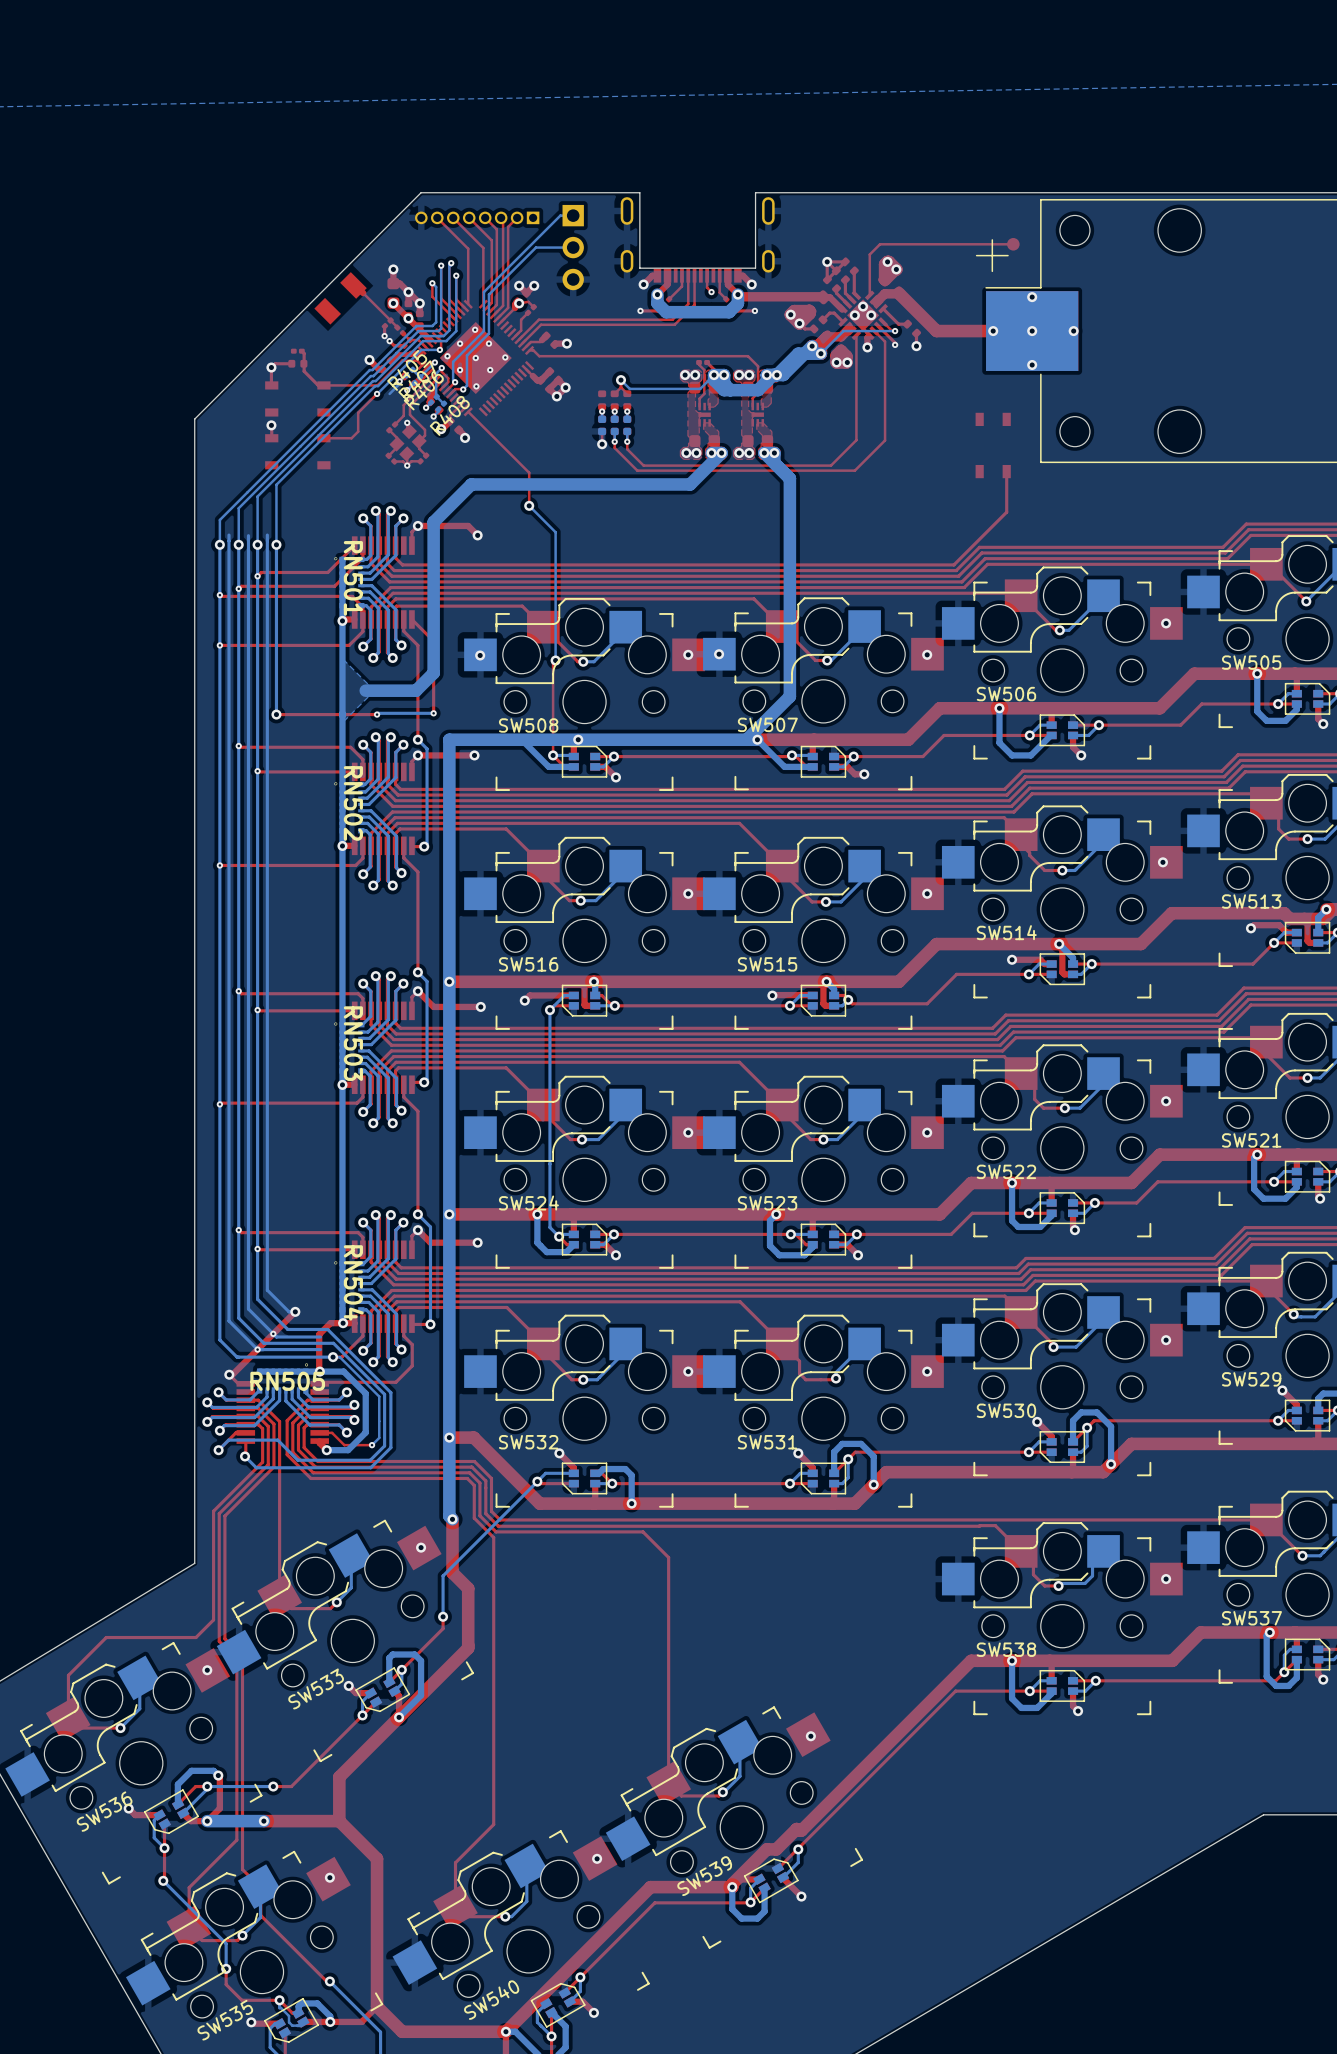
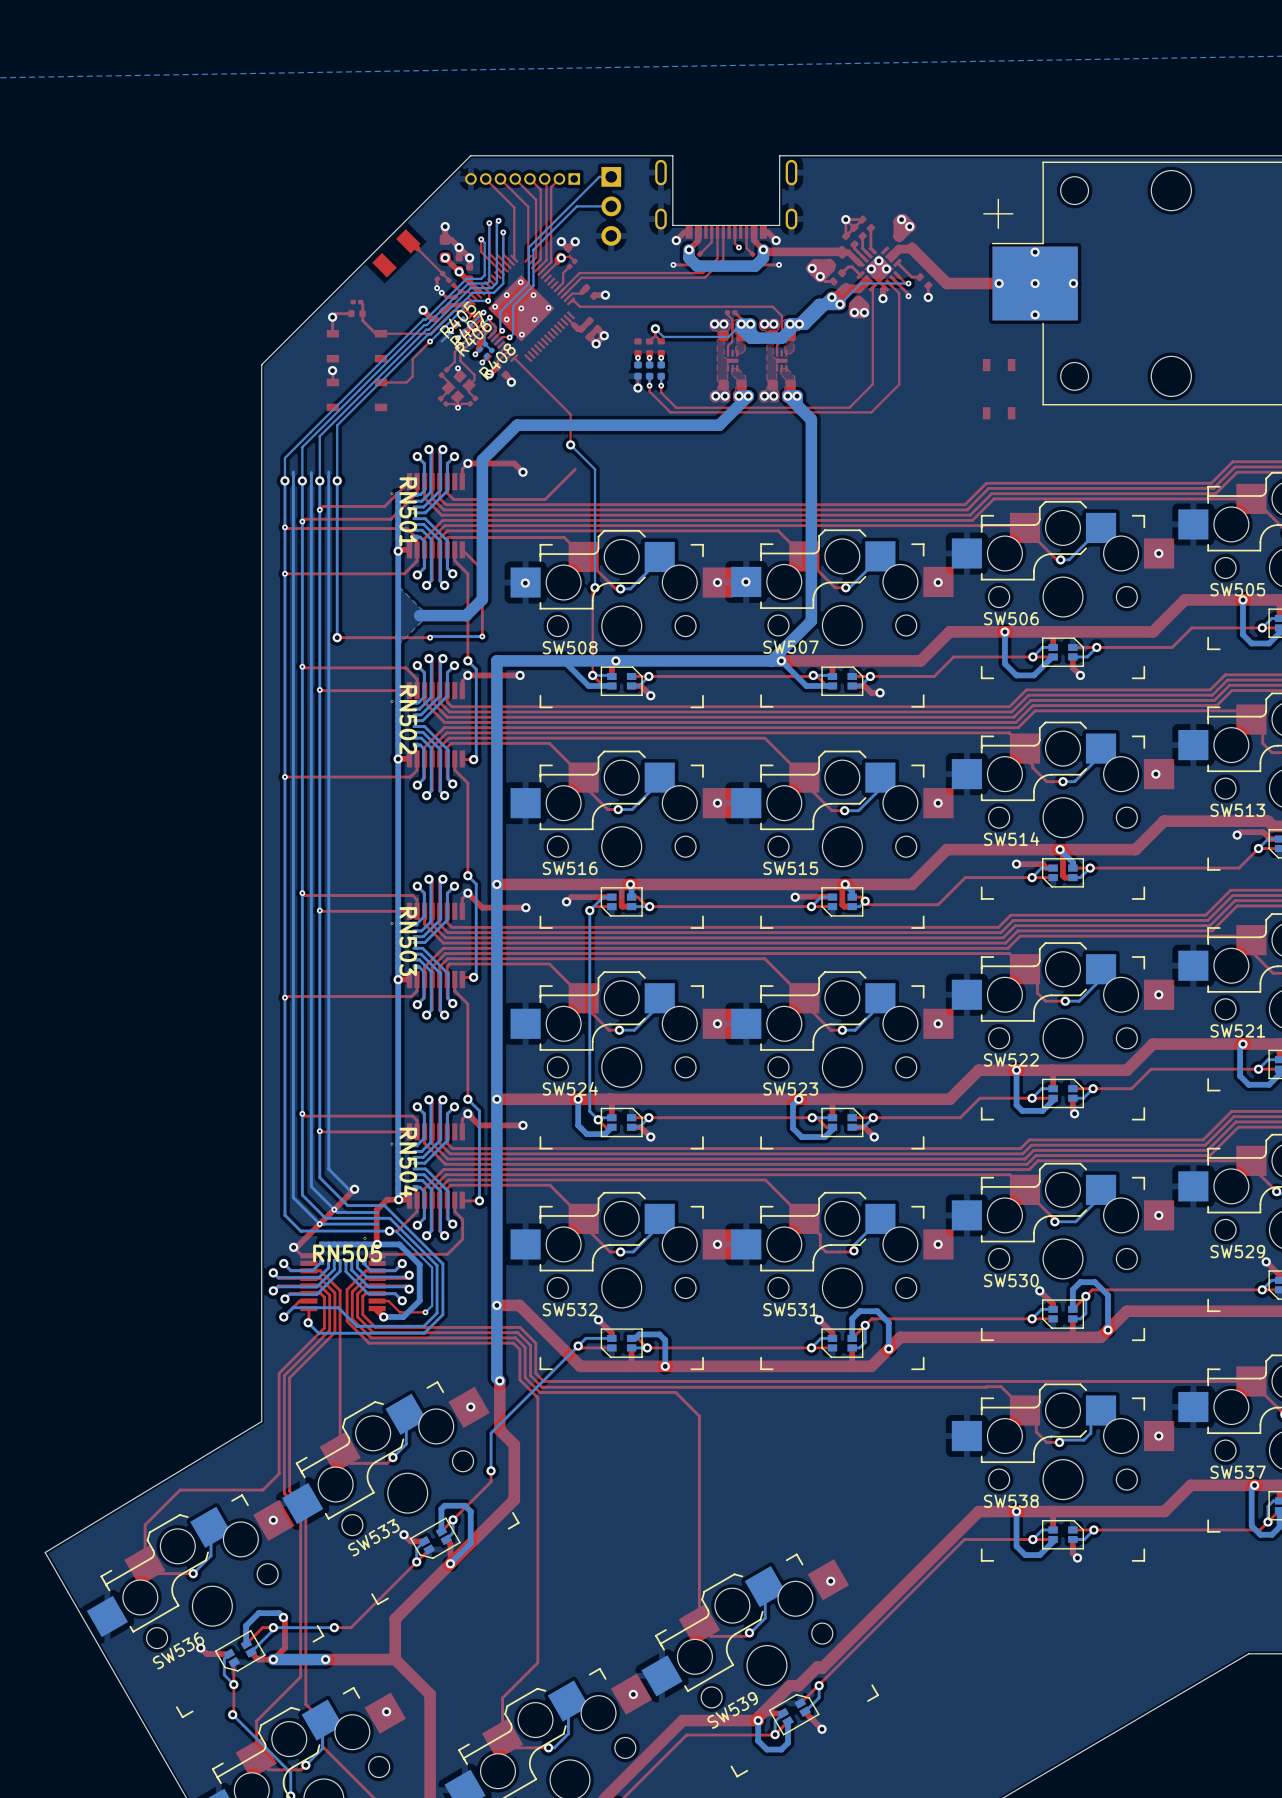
top track: (1013, 244) (880, 244) (869, 254) (869, 295) -> none
part: (1013, 244) -> none
top track: (1006, 471) (1006, 512) (953, 564) (501, 564) -> (575, 469) (545, 499)

